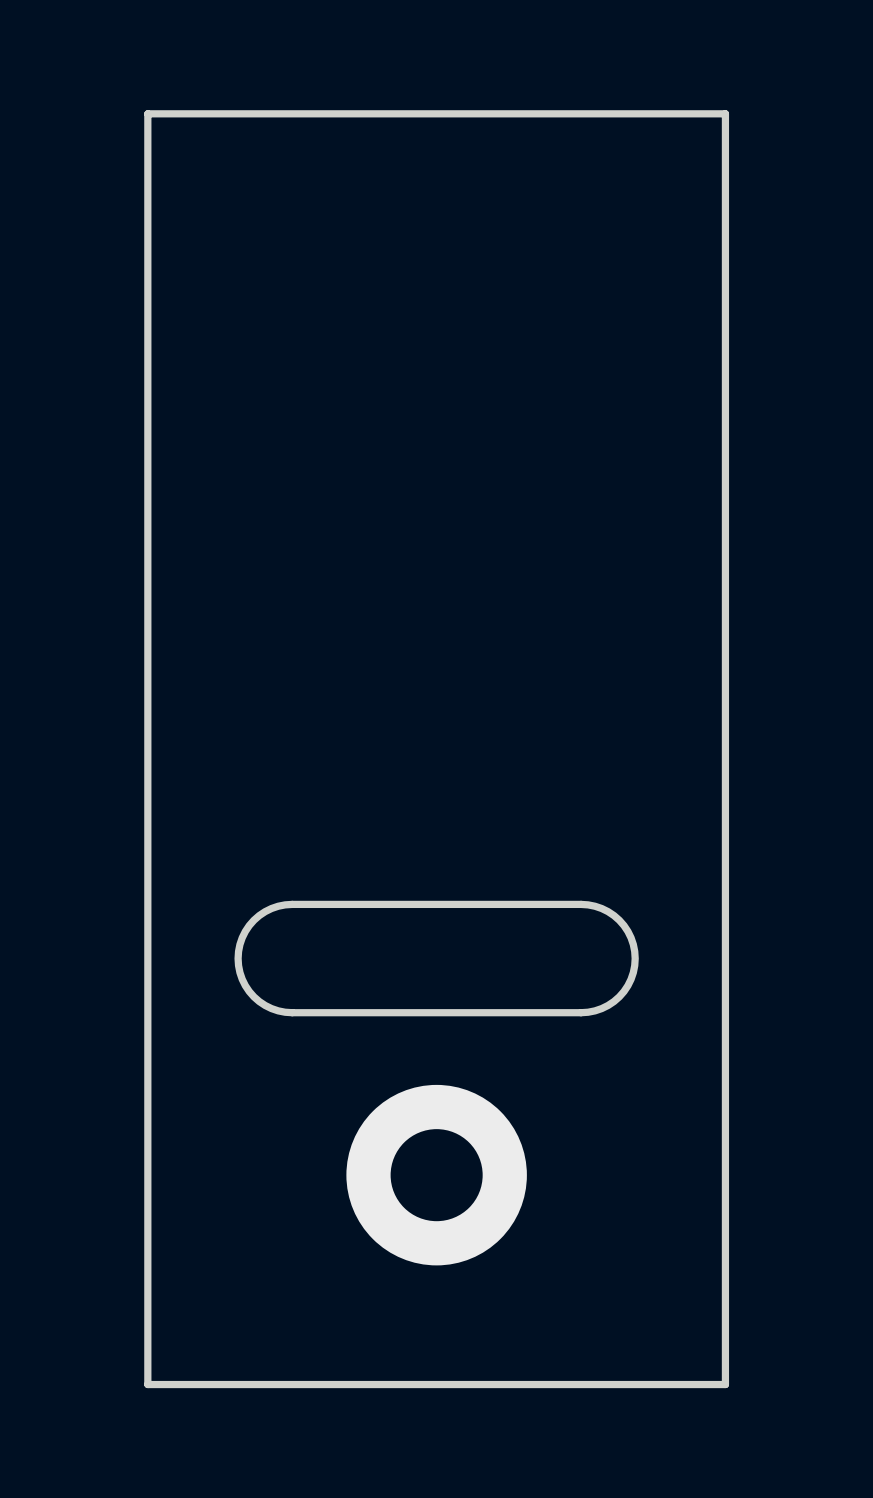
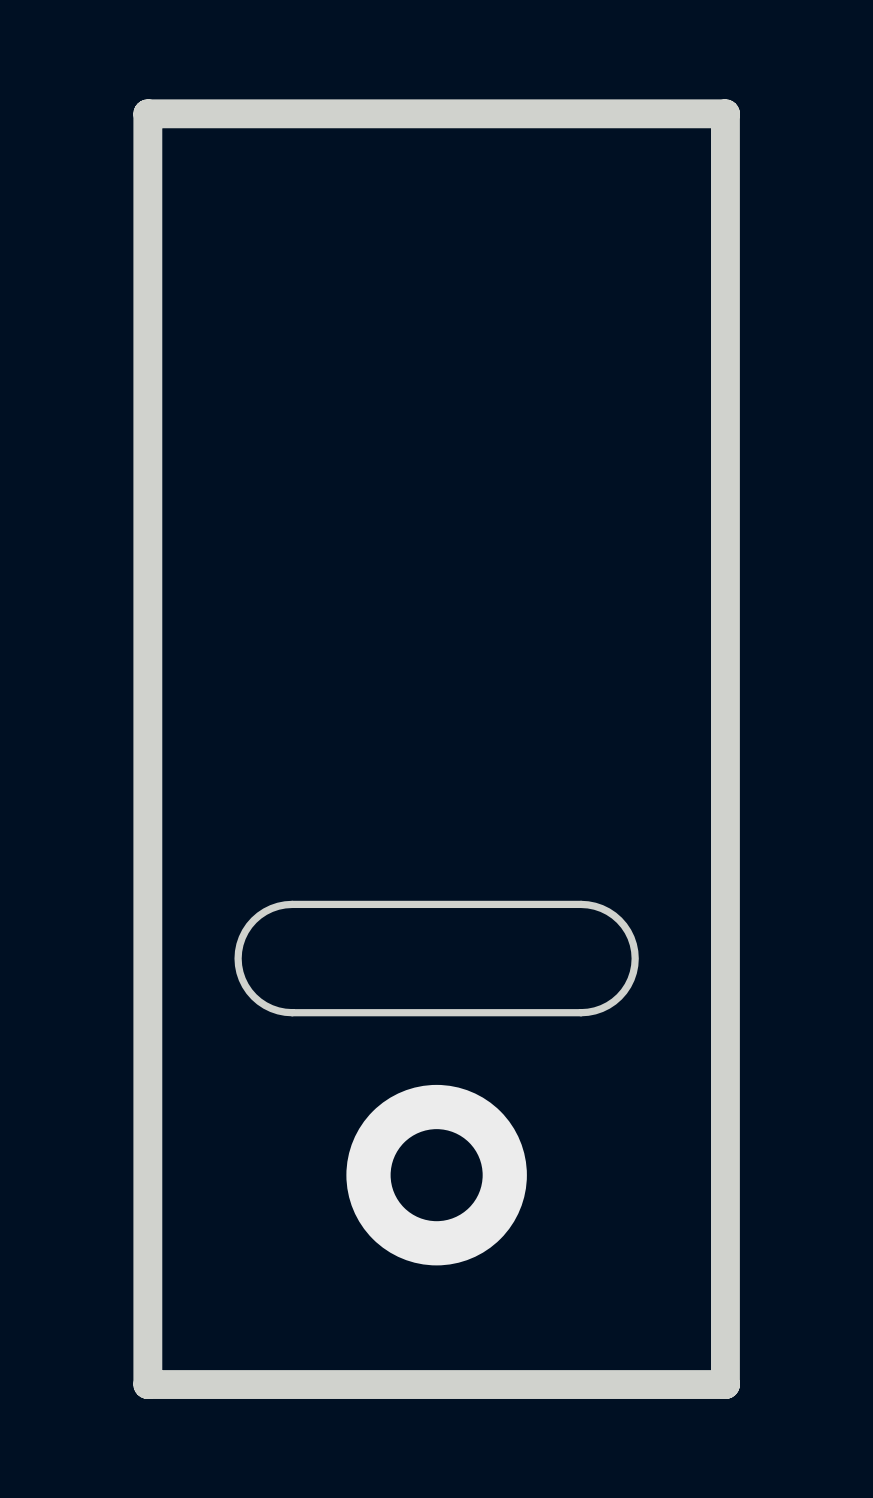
board edge width: thin (725, 113) (147, 113) (147, 1384) (725, 1384) (725, 113) -> thick (725, 113) (147, 113) (147, 1384) (725, 1384) (725, 113)

